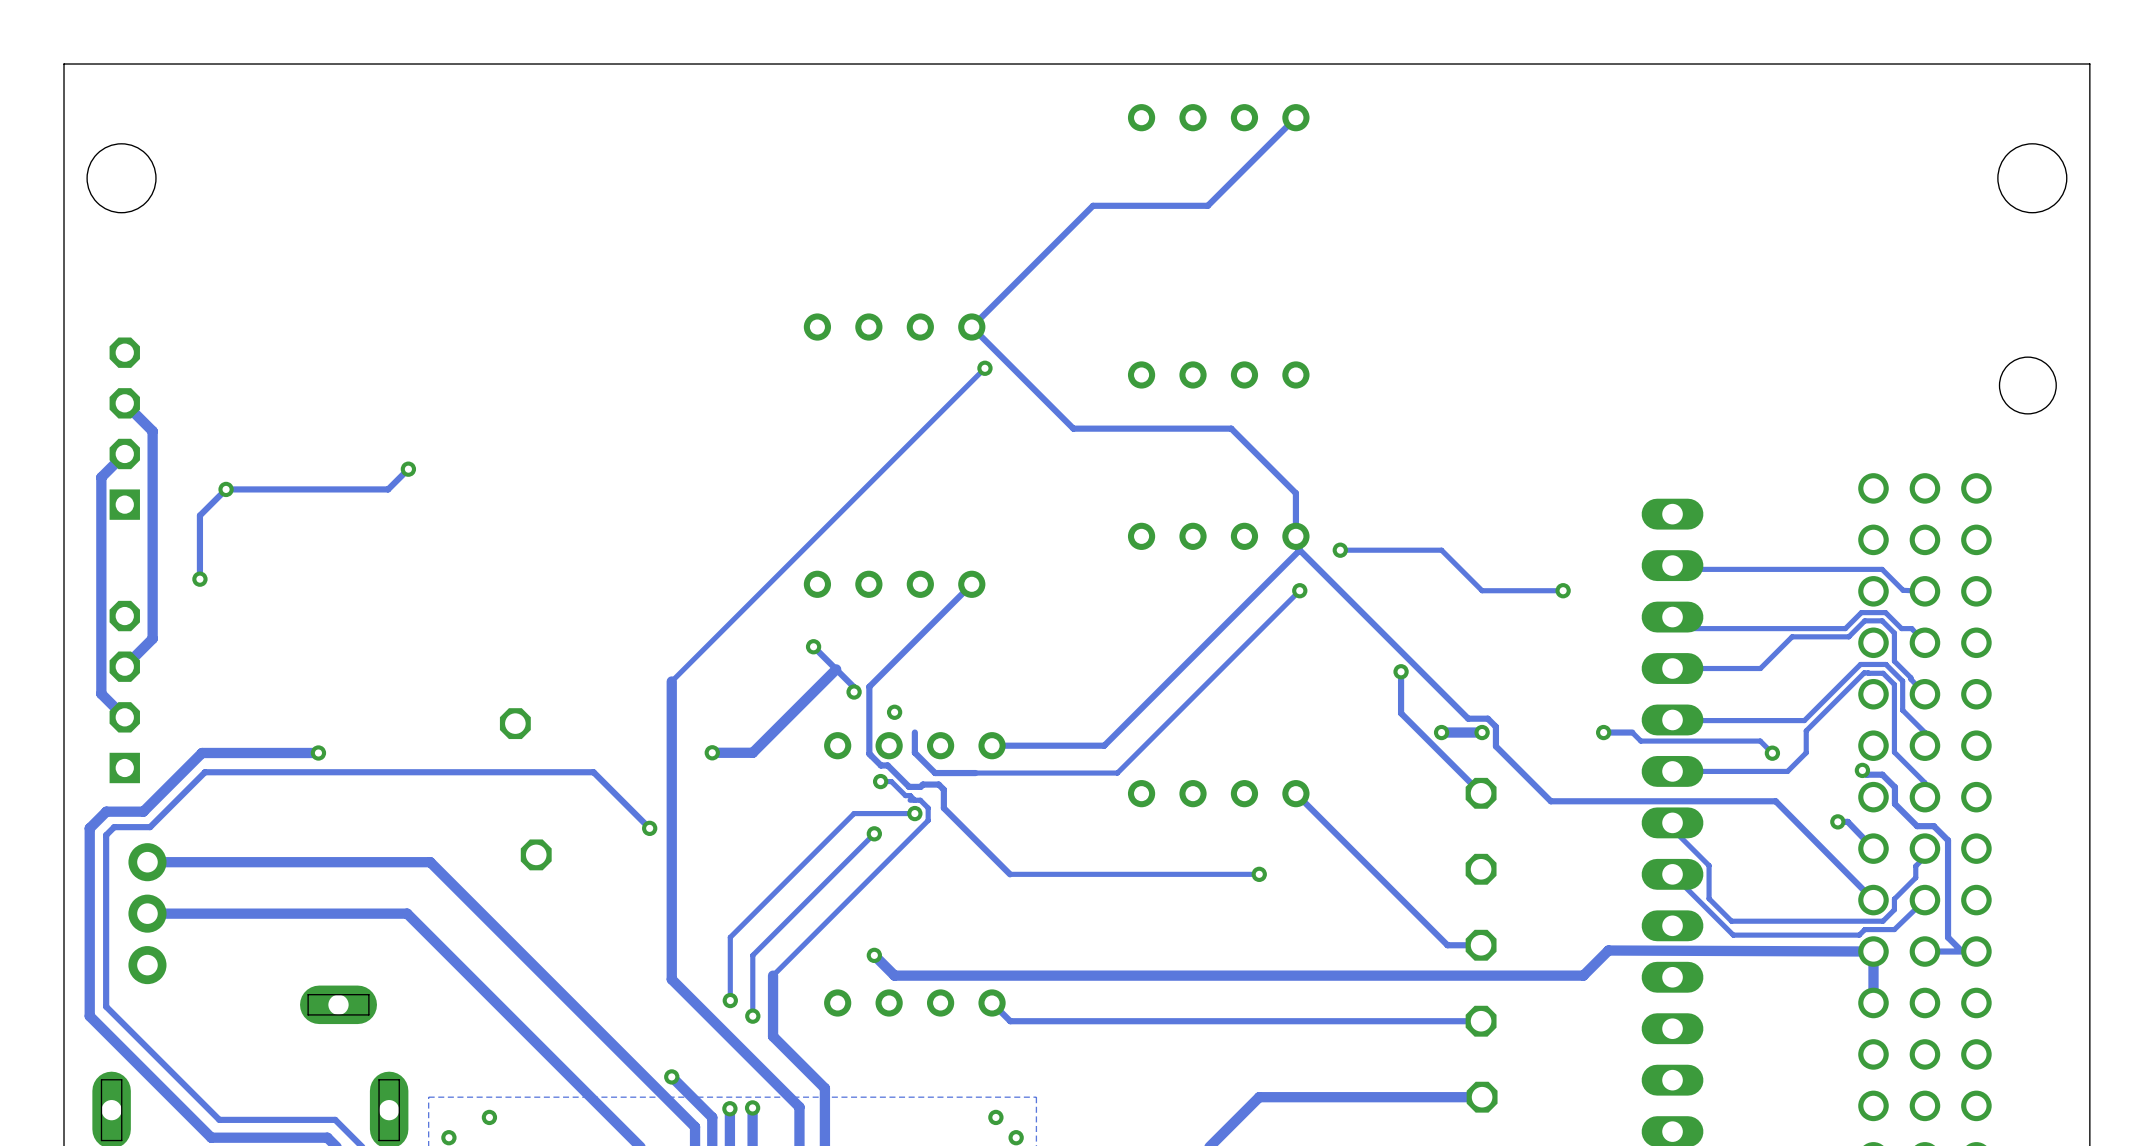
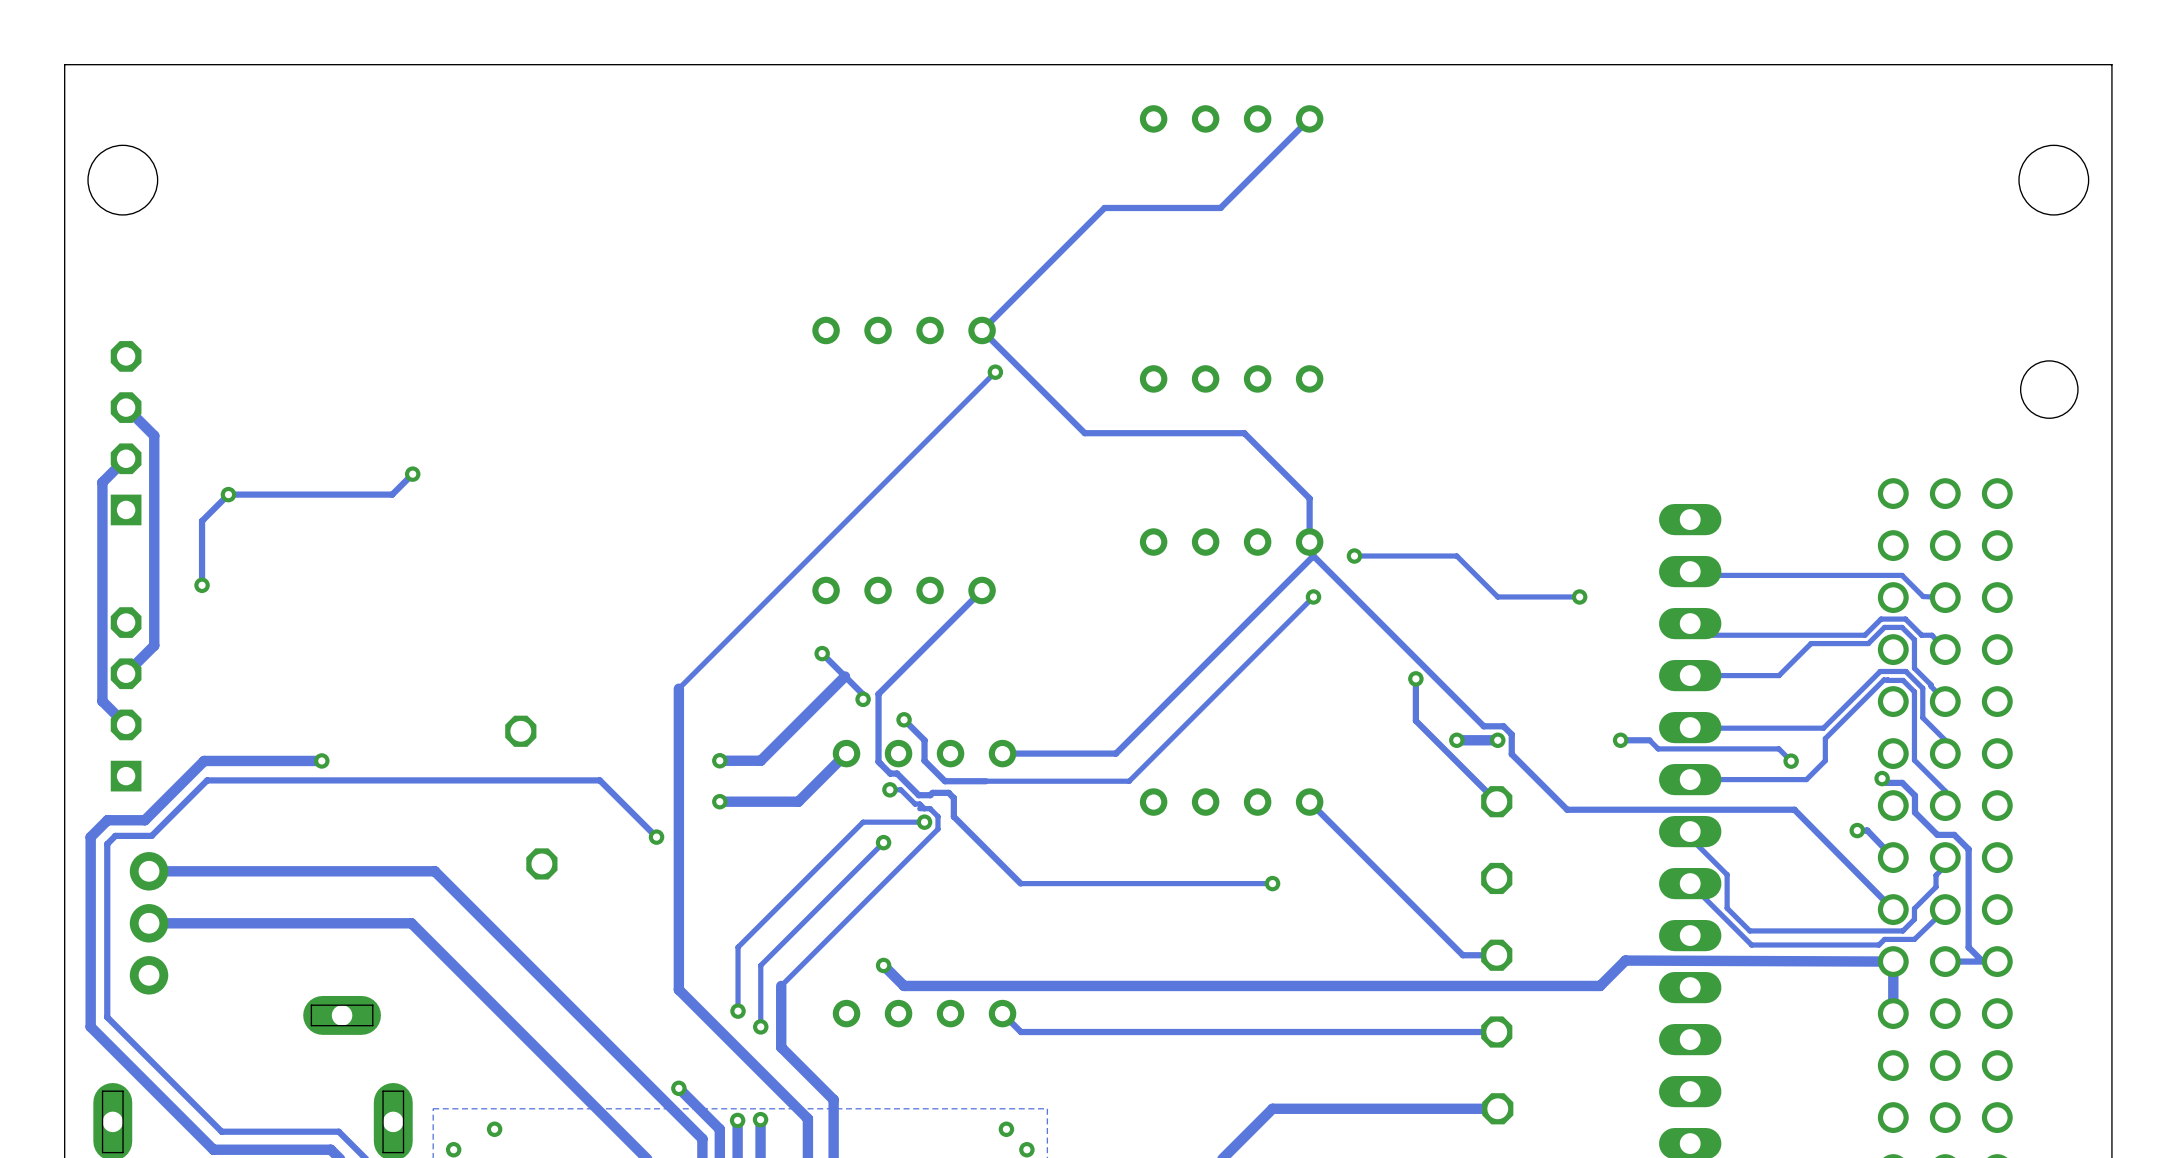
track: none -> (904, 719) (924, 740)
track: none -> (846, 753) (798, 801) (719, 801)
via: none -> (719, 801)

